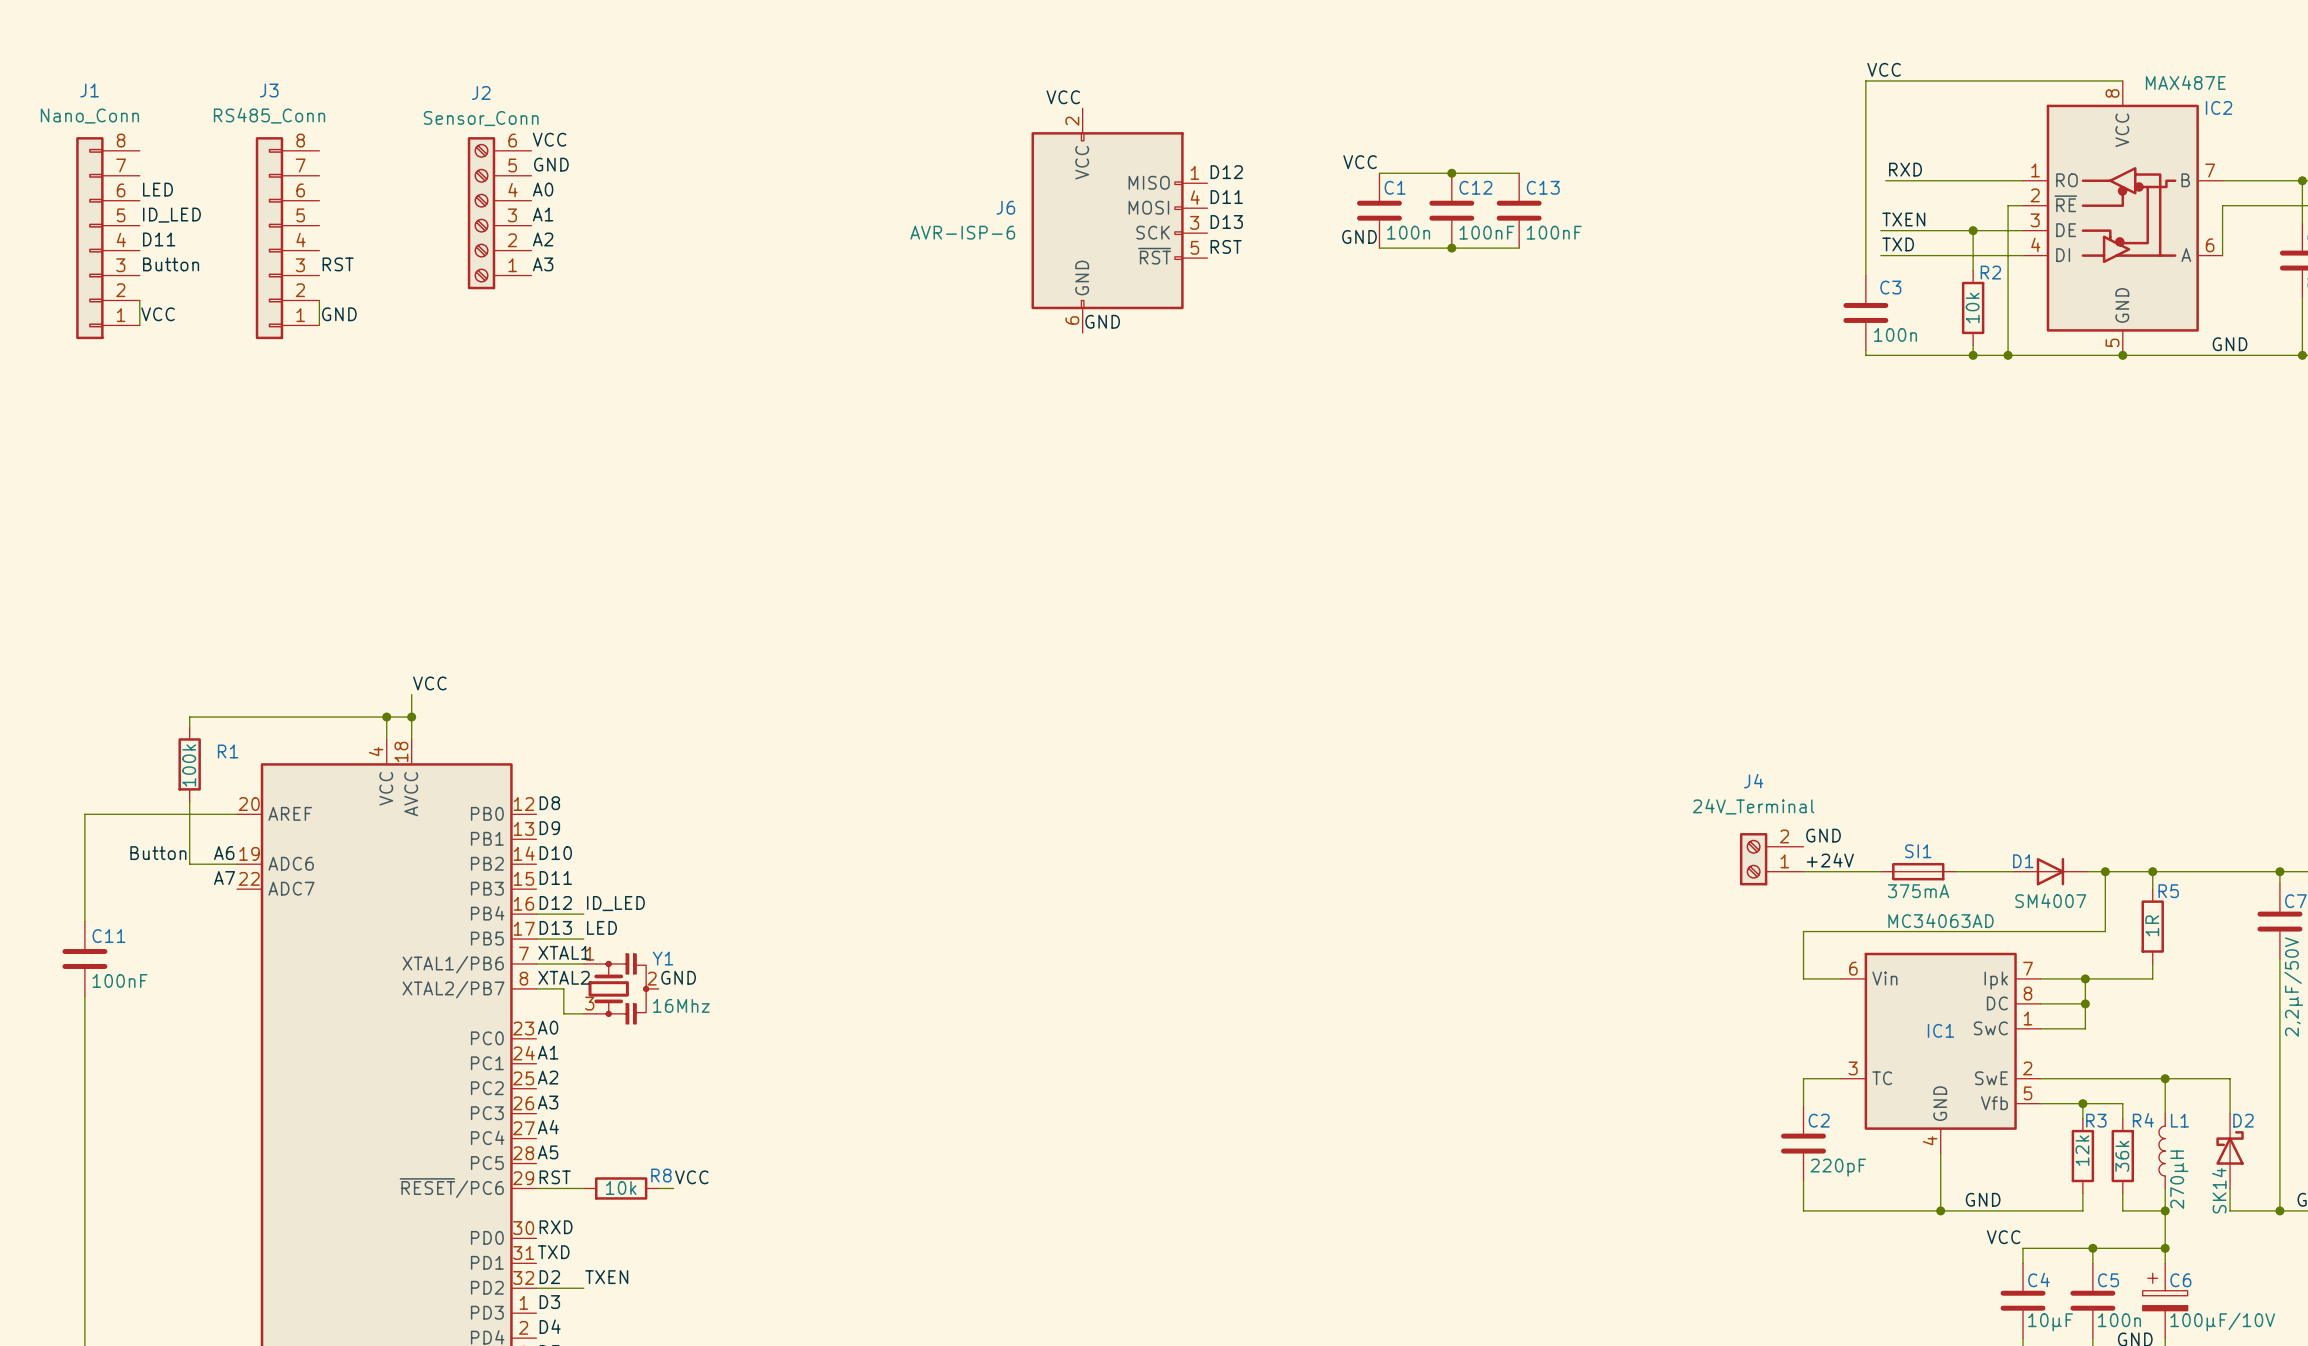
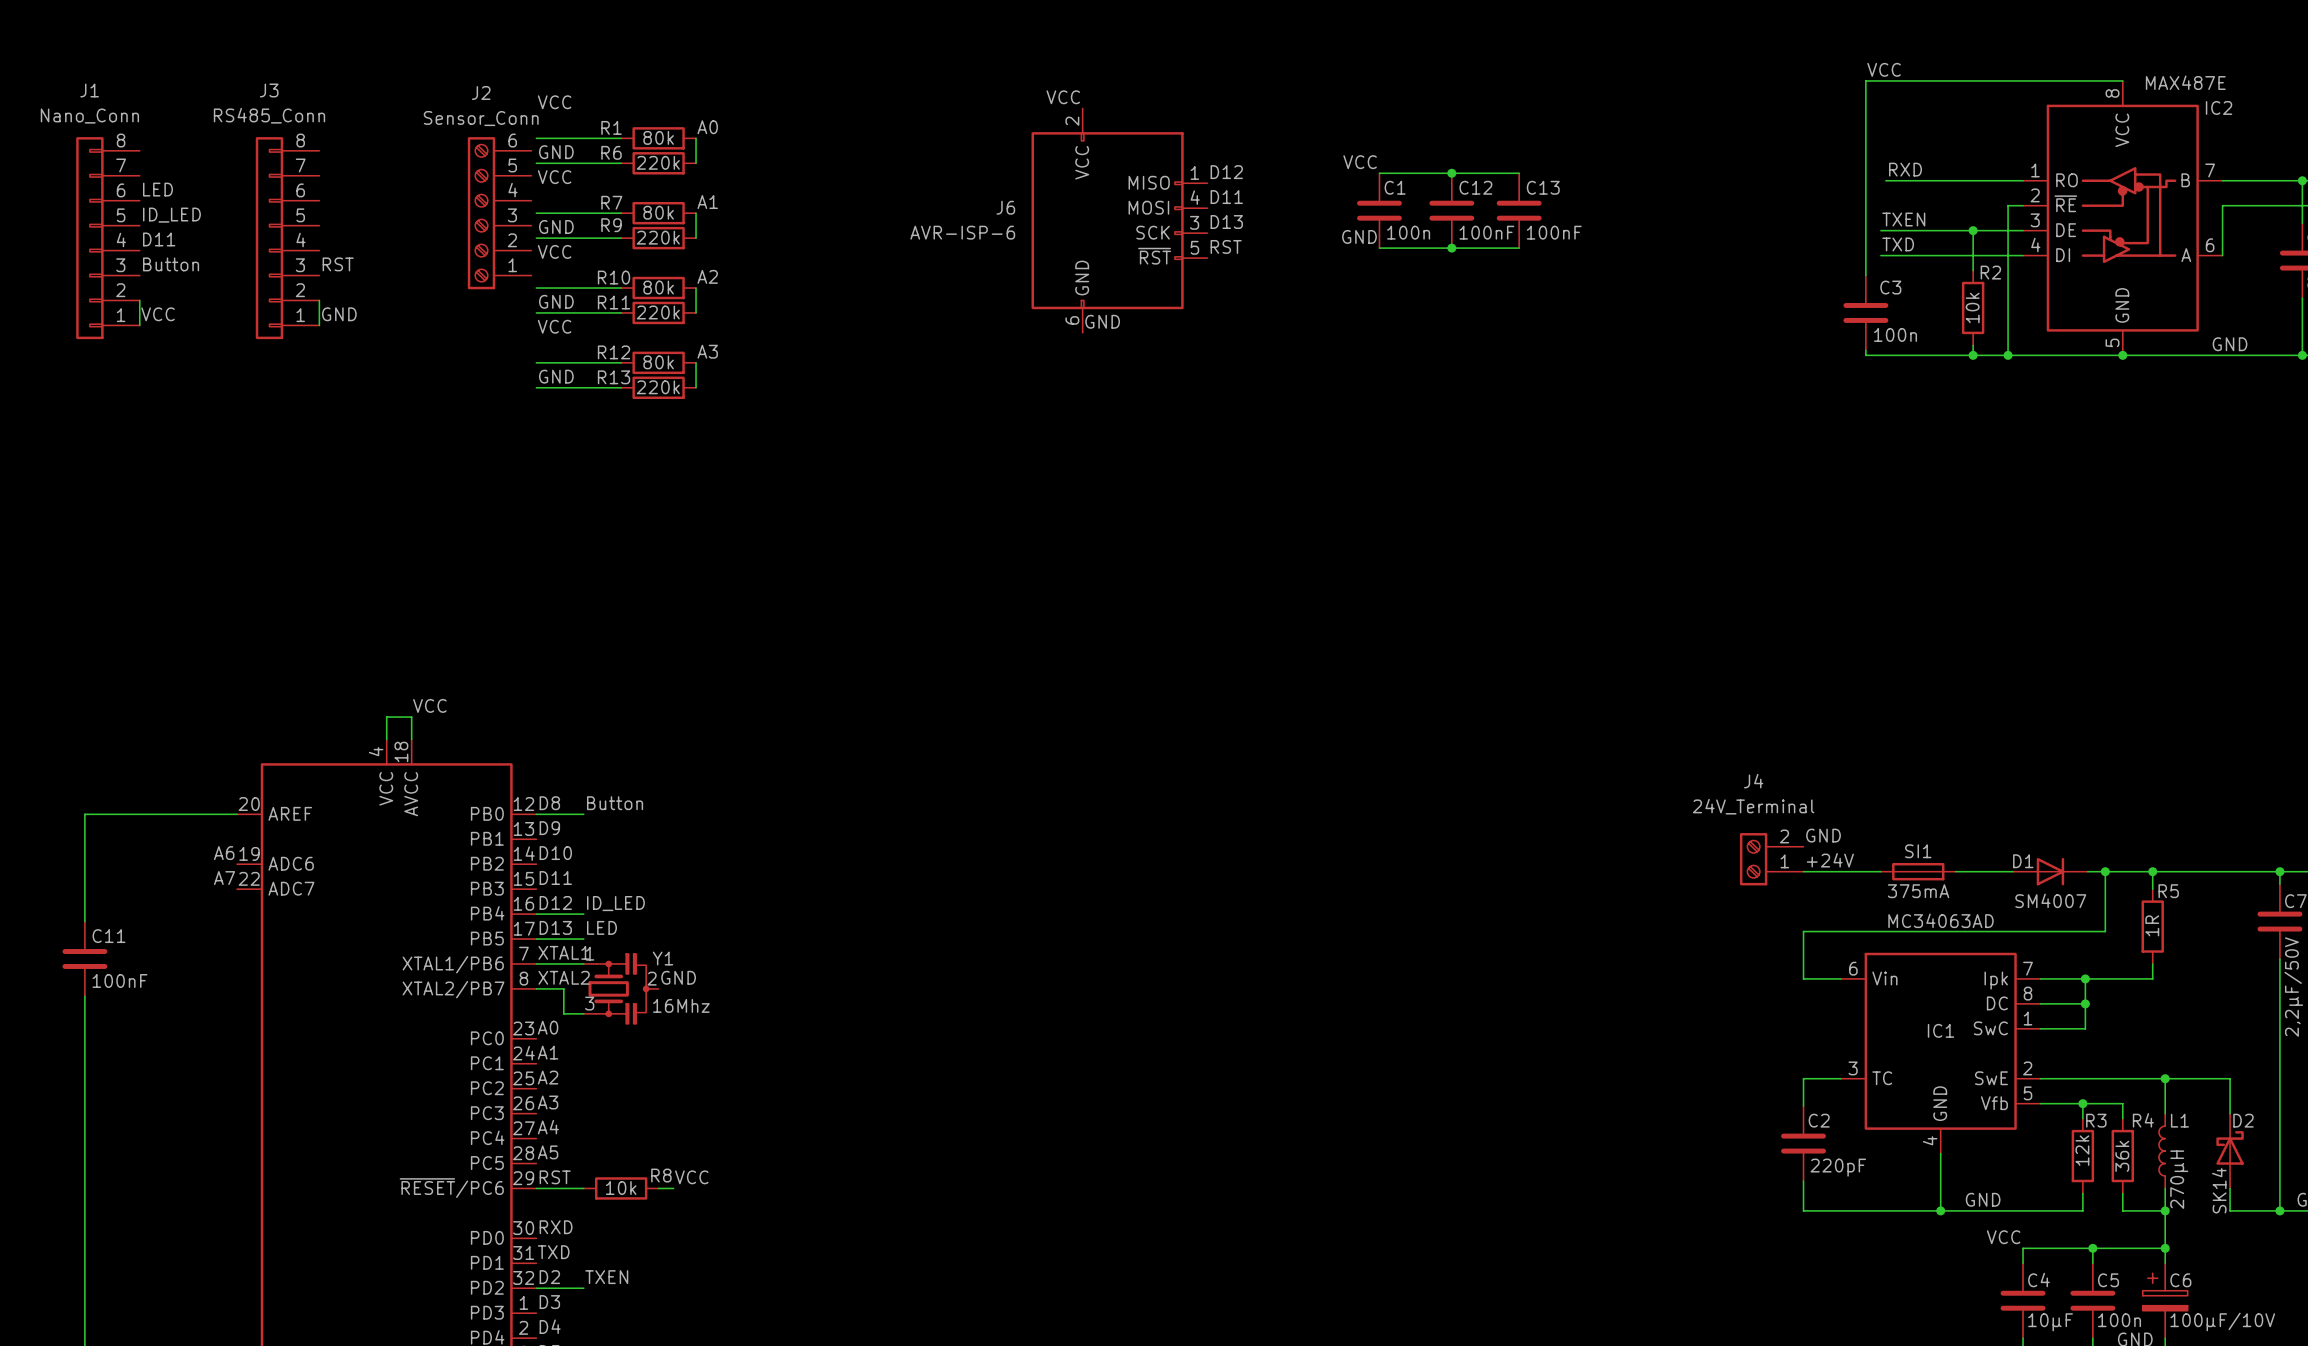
label: none -> VCC (554, 102)
wire: none -> (536, 138) (621, 138)
wire: none -> (696, 138) (696, 163)
label: VCC (549, 139) -> none
wire: none -> (536, 163) (621, 163)
R6: none -> 220k (658, 163)
label position: GND (551, 164) -> GND (556, 152)
label: none -> VCC (554, 177)
label position: A0 (543, 189) -> A0 (707, 127)
wire: none -> (536, 213) (621, 213)
R7: none -> 80k (658, 213)
wire: none -> (696, 213) (696, 238)
label position: A1 (543, 214) -> A1 (707, 202)
label: none -> GND (556, 226)
wire: none -> (536, 238) (621, 238)
R9: none -> 220k (658, 238)
label position: A2 (543, 239) -> A2 (707, 276)
label: none -> VCC (554, 251)
label position: A3 (543, 264) -> A3 (707, 351)
wire: none -> (536, 288) (621, 288)
R10: none -> 80k (658, 288)
wire: none -> (696, 288) (696, 312)
label: none -> GND (556, 301)
wire: none -> (536, 312) (621, 312)
R11: none -> 220k (658, 312)
label: none -> VCC (554, 326)
wire: none -> (536, 362) (621, 362)
R12: none -> 80k (658, 362)
wire: none -> (696, 362) (696, 387)
label: none -> GND (556, 376)
wire: none -> (536, 387) (621, 387)
R13: none -> 220k (658, 387)
label position: VCC (429, 683) -> VCC (429, 705)
wire: (411, 694) (411, 717) -> none
wire: (386, 717) (189, 717) (189, 727) -> none
junction: (386, 717) -> none
junction: (411, 717) -> none
R1 name position: R1 (228, 751) -> R1 (611, 127)
R1 rotation: 0° (189, 764) -> 90° clockwise (658, 138)
R1 position: (189, 764) -> (658, 138)
R1 value: 100k (189, 765) -> 80k (658, 137)
wire: (189, 801) (189, 864) (237, 864) -> none
label: none -> Button (615, 803)
wire: none -> (536, 814) (583, 814)
label: Button (158, 853) -> none

